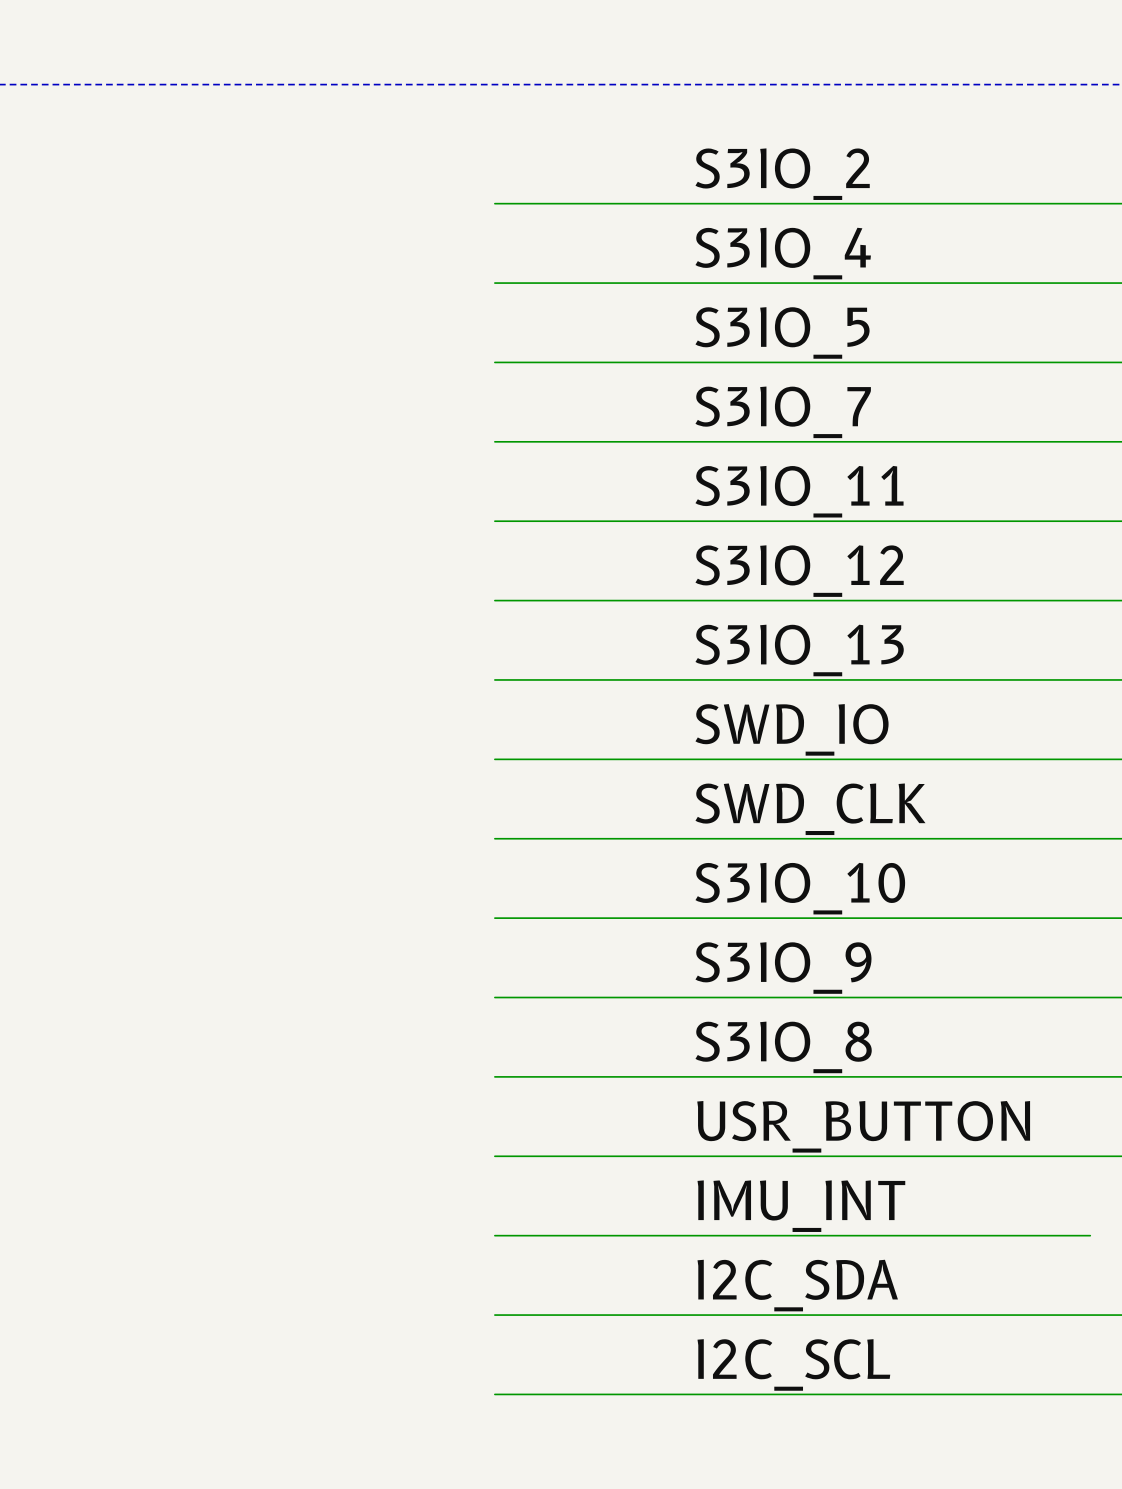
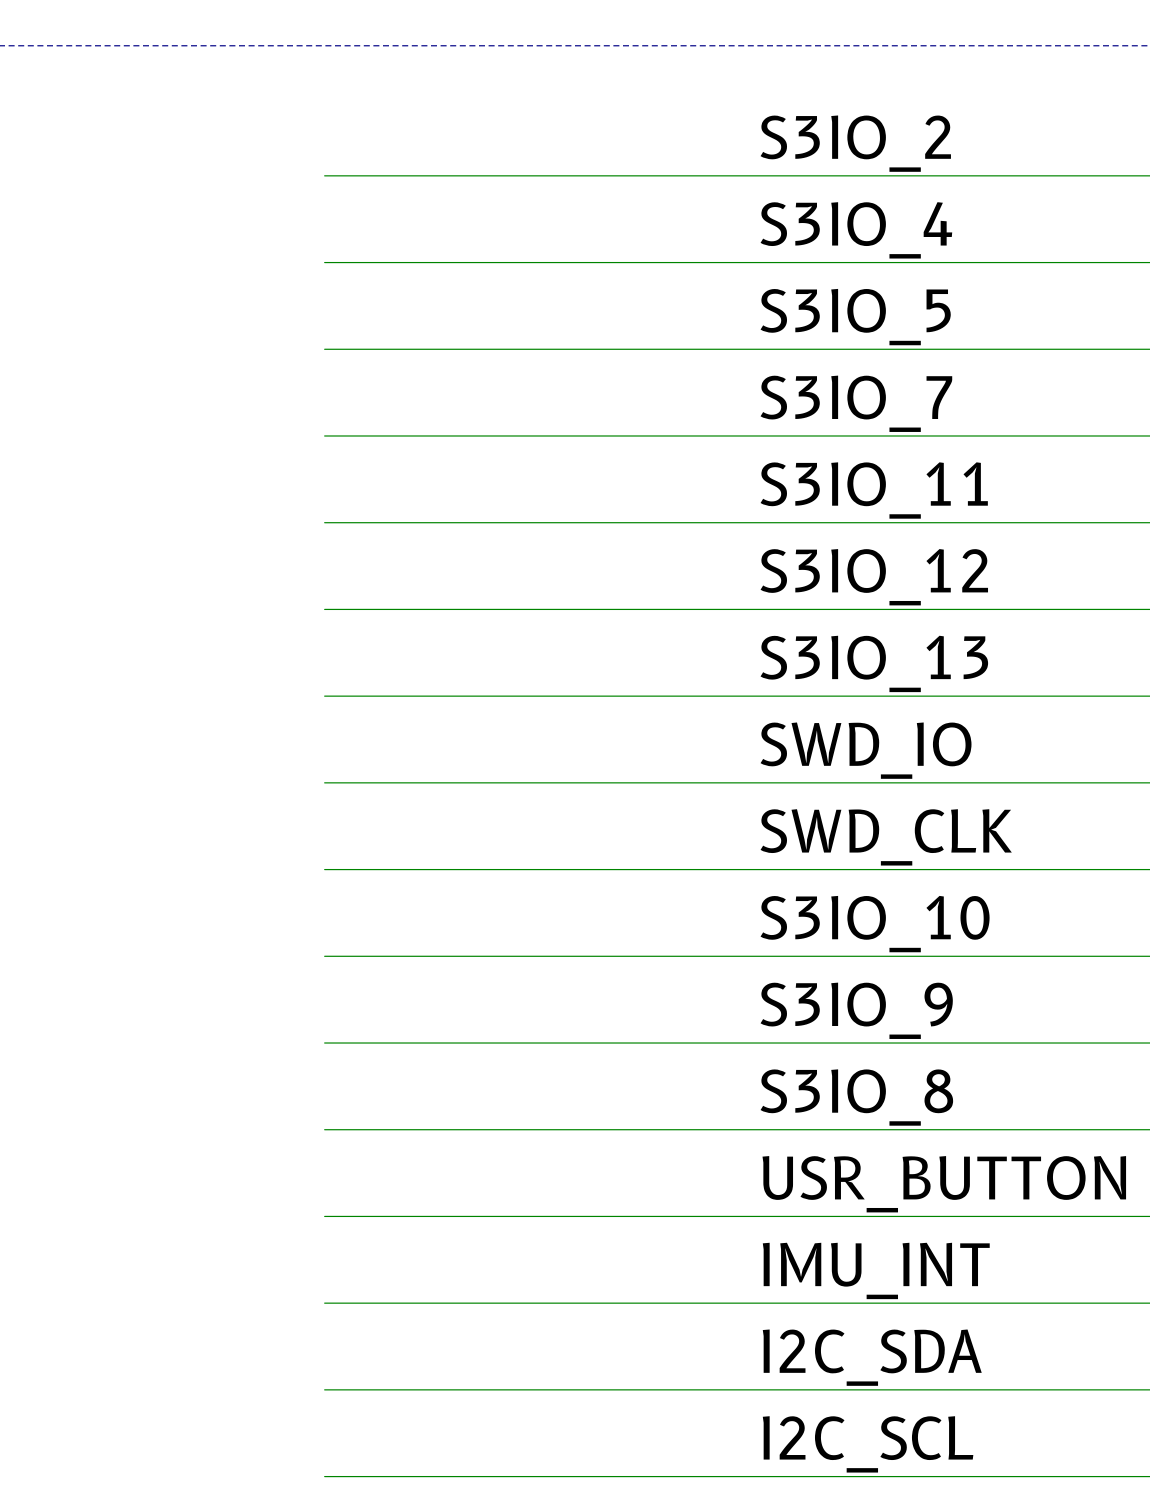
wire: none -> (324, 175) (541, 175)
wire: none -> (324, 262) (541, 262)
wire: none -> (324, 349) (541, 349)
wire: none -> (324, 435) (541, 435)
wire: none -> (324, 522) (541, 522)
wire: none -> (324, 609) (541, 609)
wire: none -> (324, 696) (541, 696)
wire: none -> (324, 782) (541, 782)
wire: none -> (324, 869) (541, 869)
wire: none -> (324, 956) (541, 956)
wire: none -> (324, 1043) (541, 1043)
wire: none -> (324, 1129) (541, 1129)
wire: none -> (324, 1216) (541, 1216)
wire: none -> (324, 1303) (541, 1303)
wire: none -> (324, 1389) (541, 1389)
wire: none -> (324, 1476) (541, 1476)

